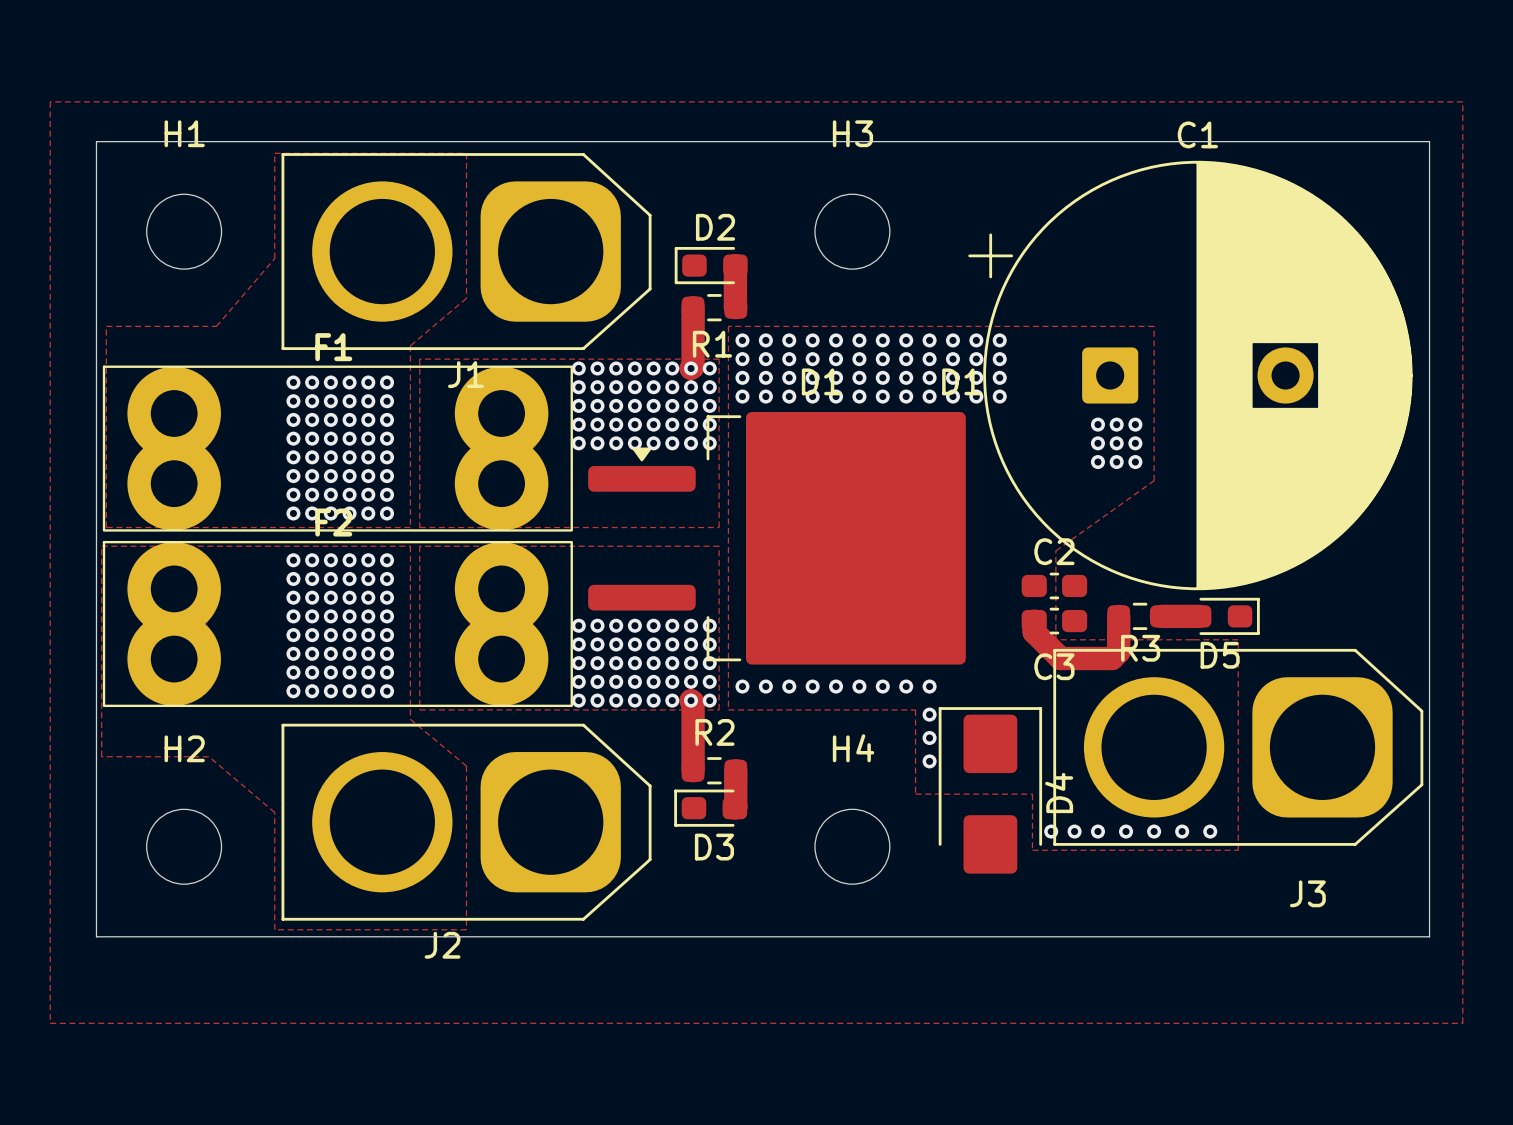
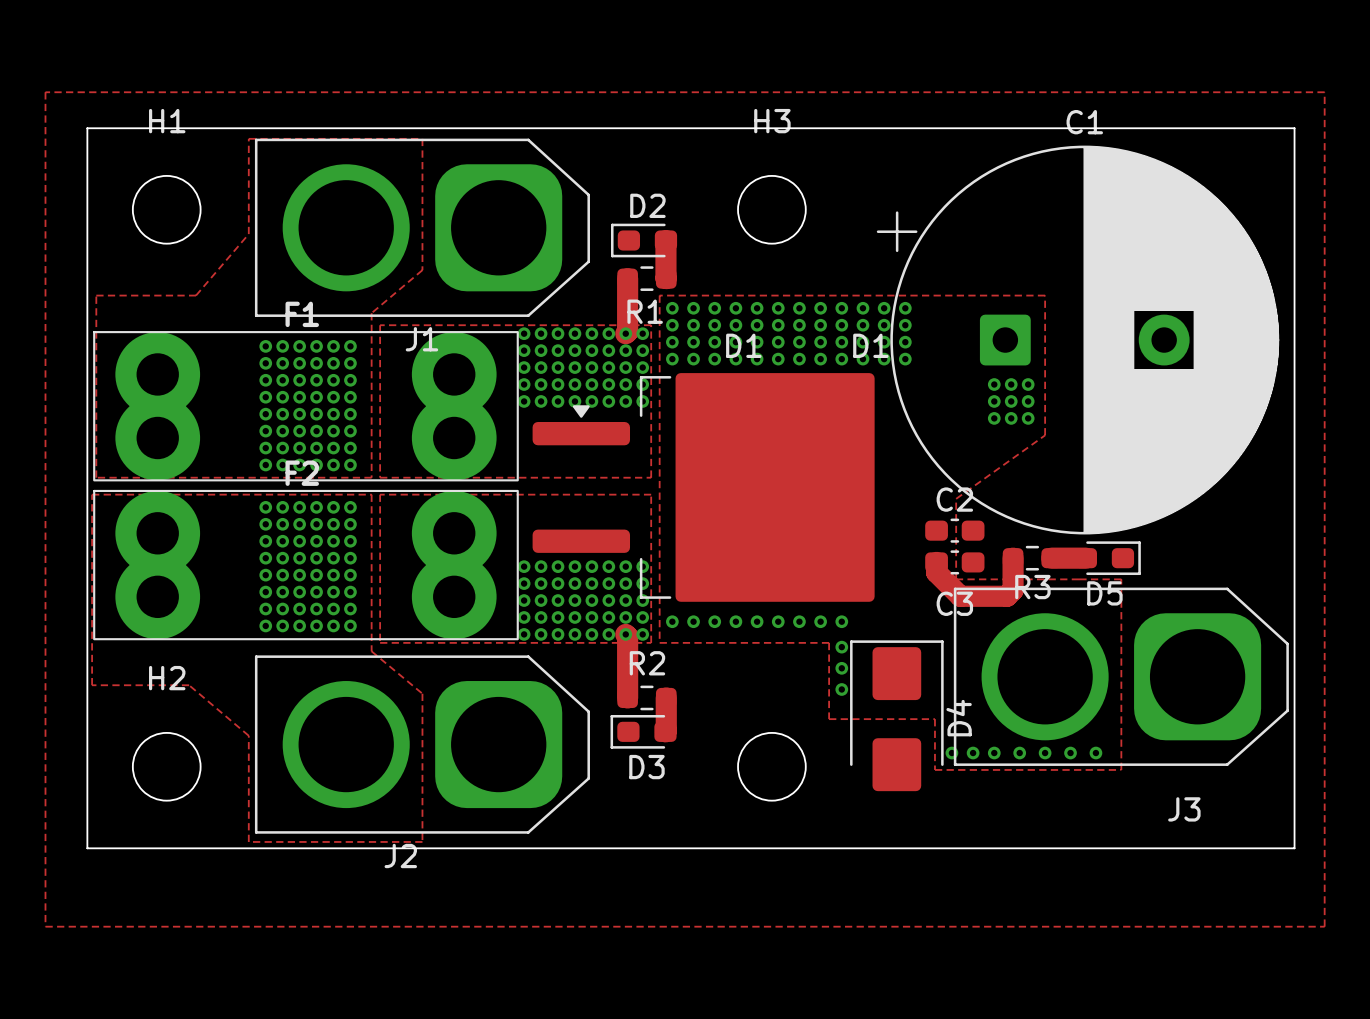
H4 name: H4 (853, 748) -> none

